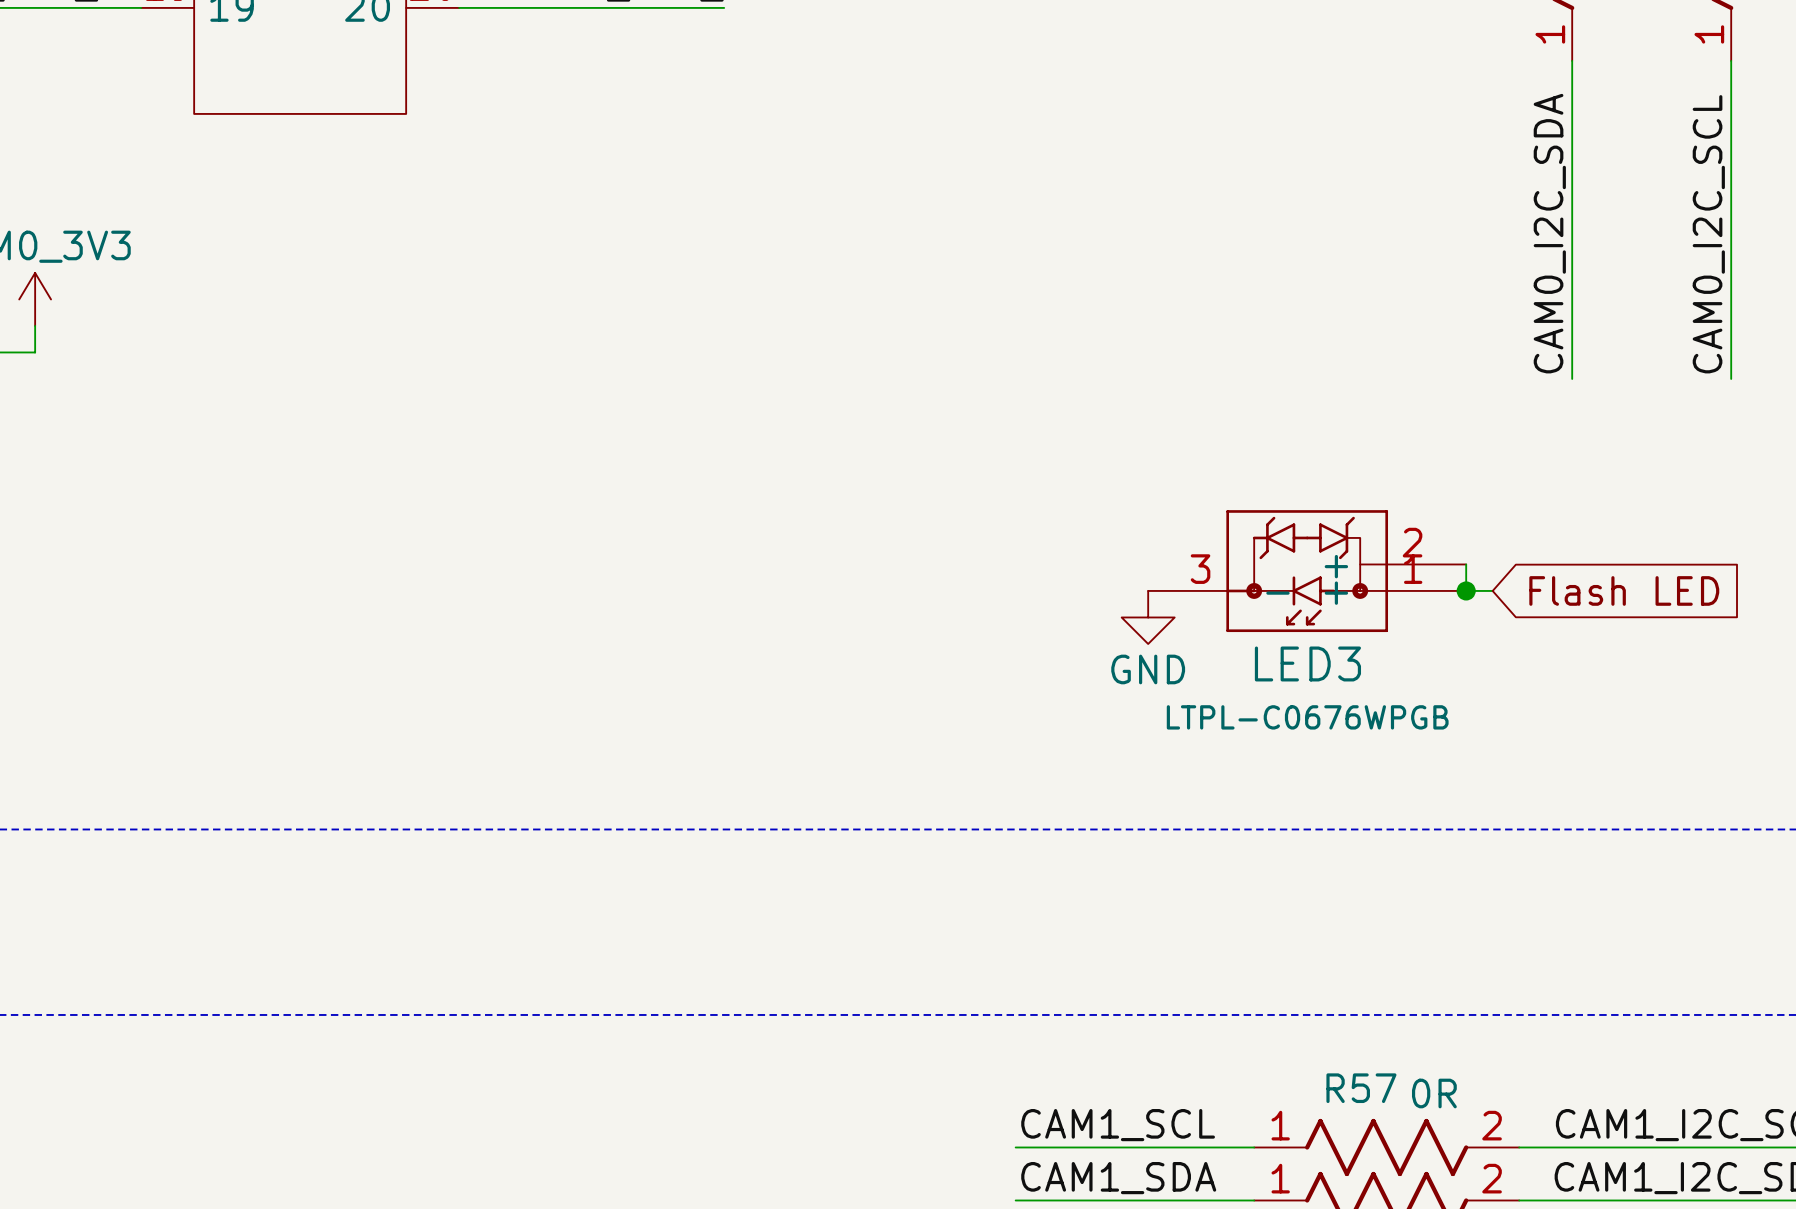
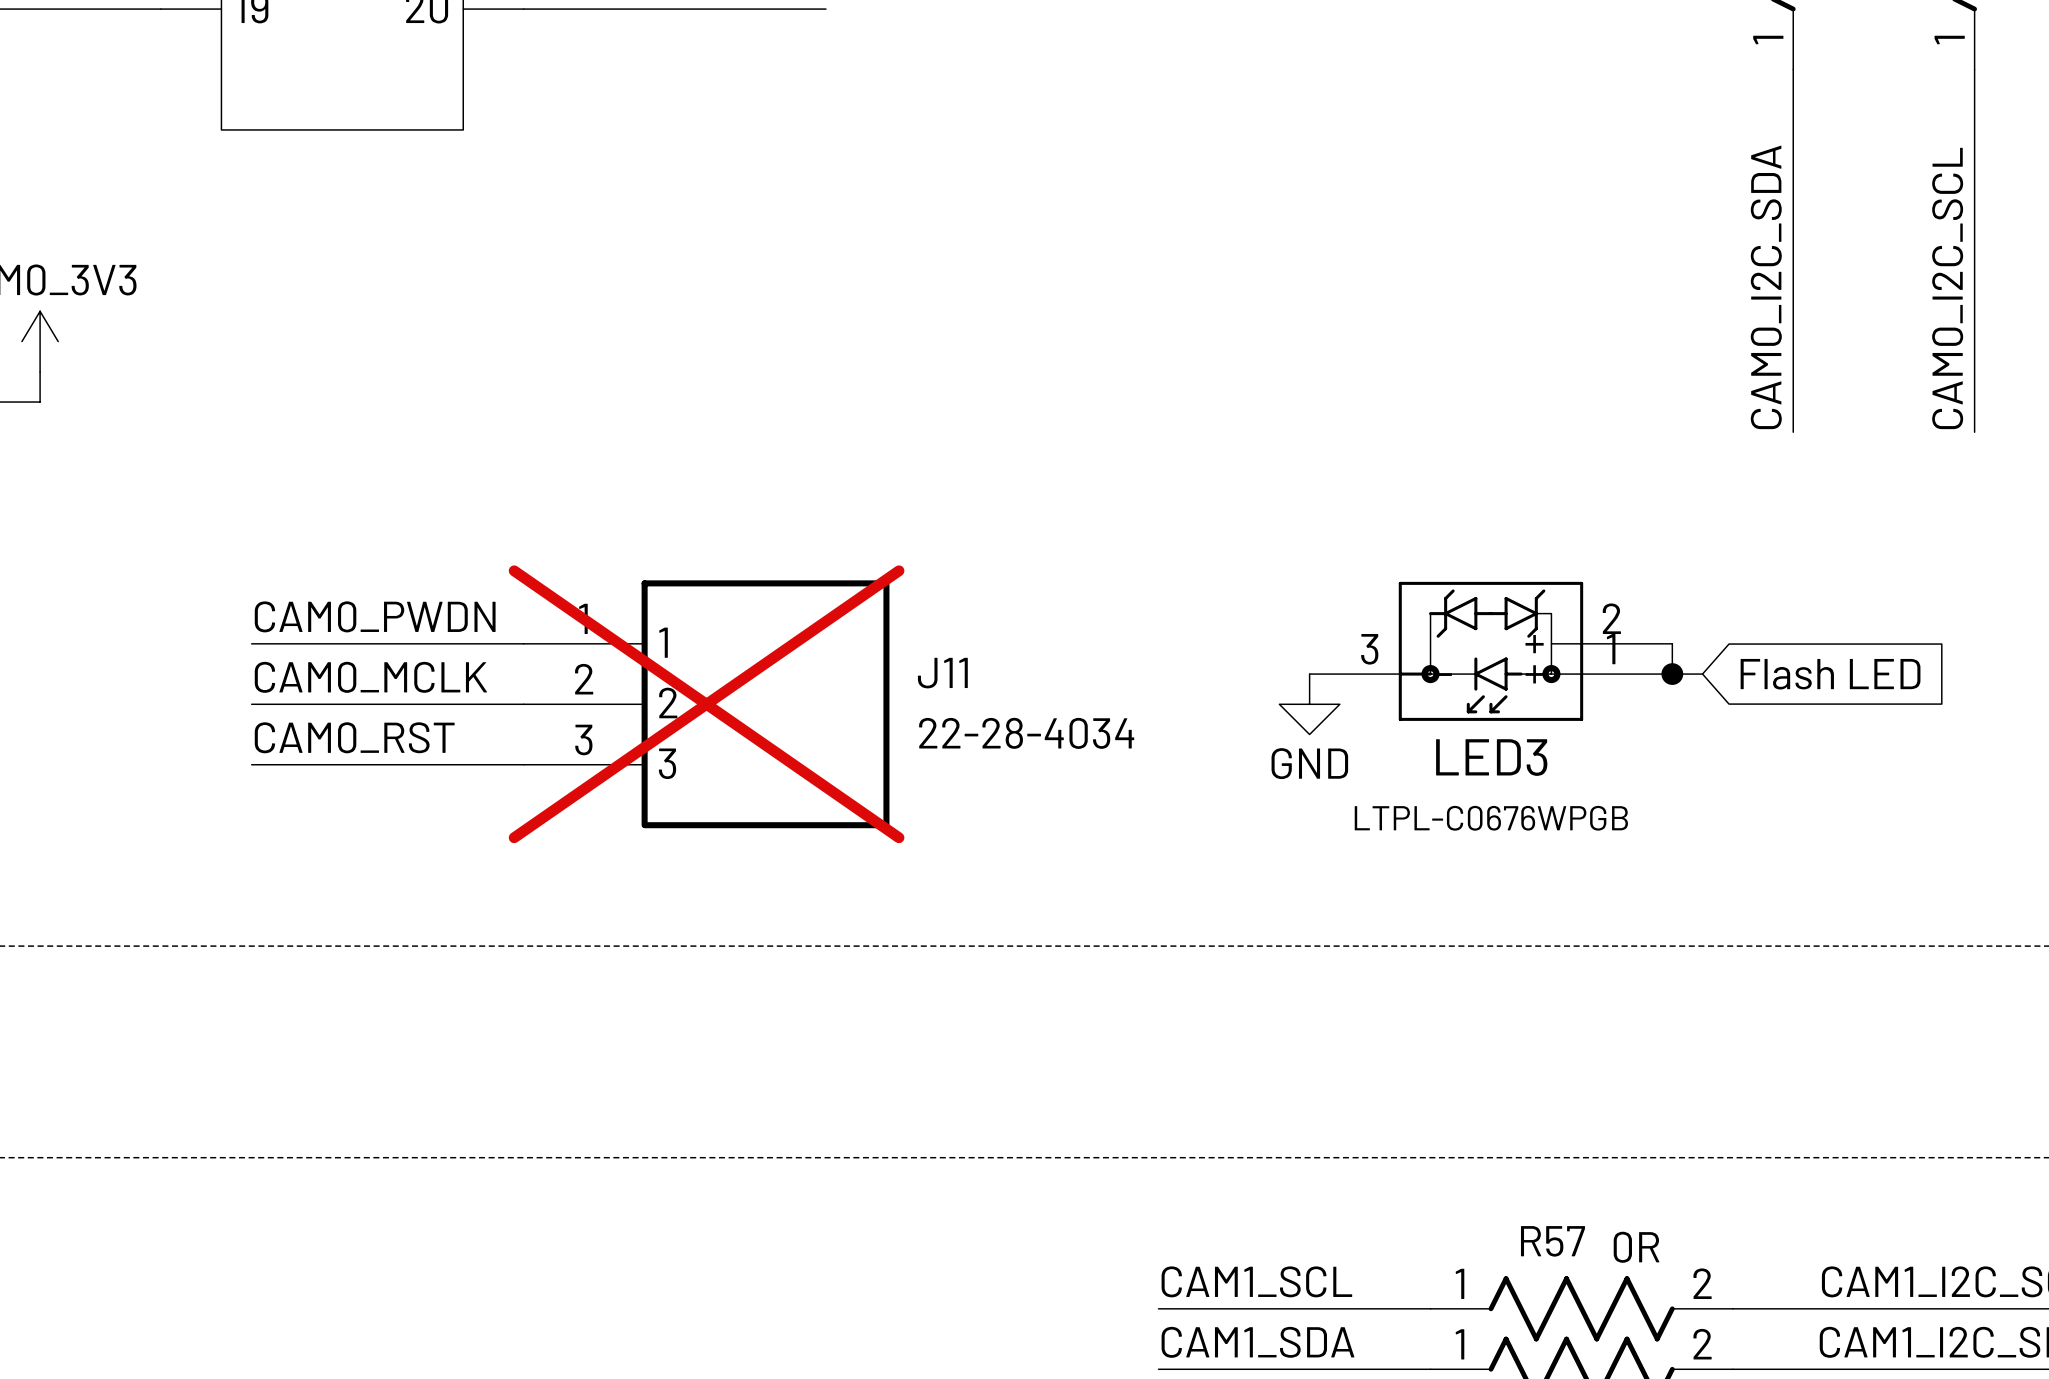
label: none -> CAM0_PWDN (375, 616)
wire: none -> (251, 643) (523, 643)
label: none -> CAM0_MCLK (370, 677)
wire: none -> (251, 704) (523, 704)
J11: none -> 22-28-4034 (706, 704)
label: none -> CAM0_RST (354, 737)
wire: none -> (251, 764) (523, 764)

